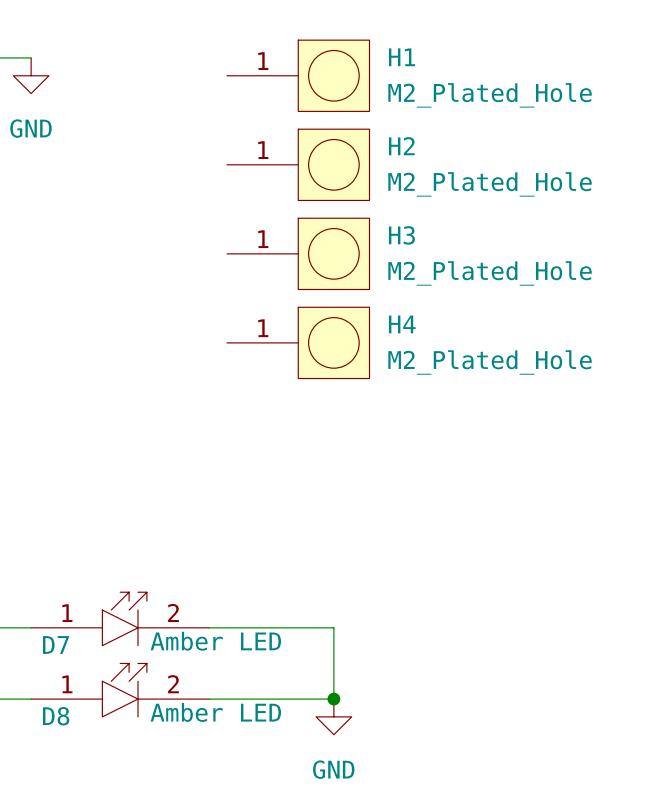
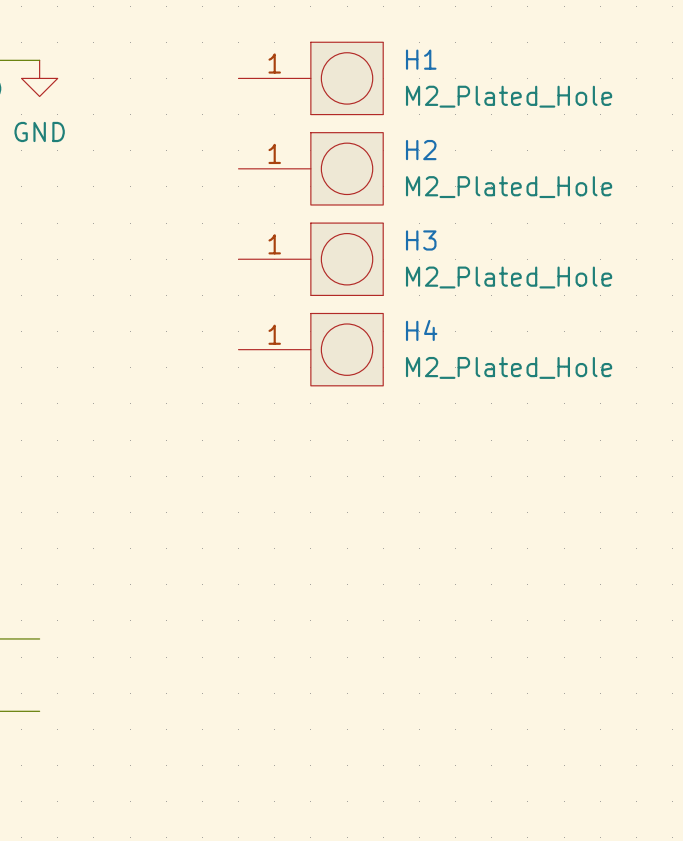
D7: (120, 618) -> none
wire: (209, 627) (333, 627) (333, 699) (209, 699) -> none
D8: (120, 690) -> none
junction: (333, 699) -> none
power symbol: GND (333, 716) -> none

